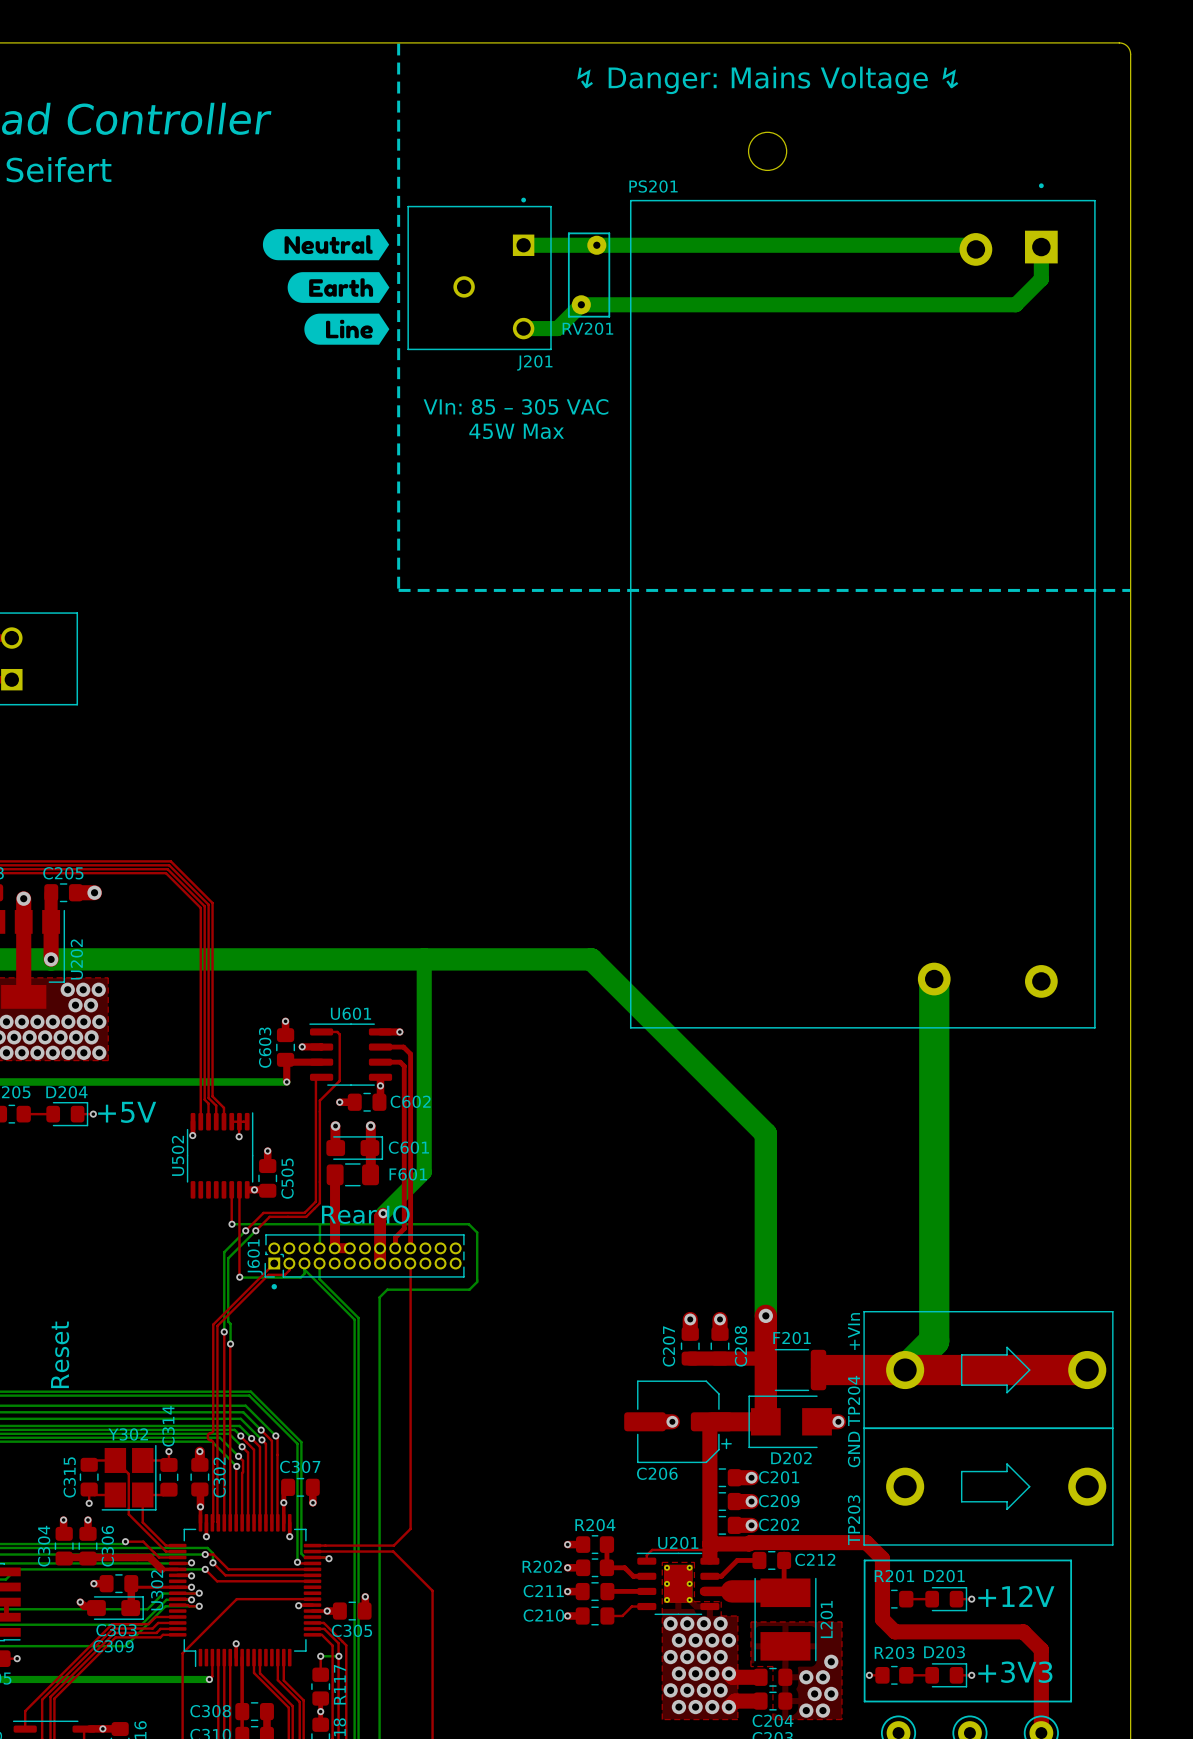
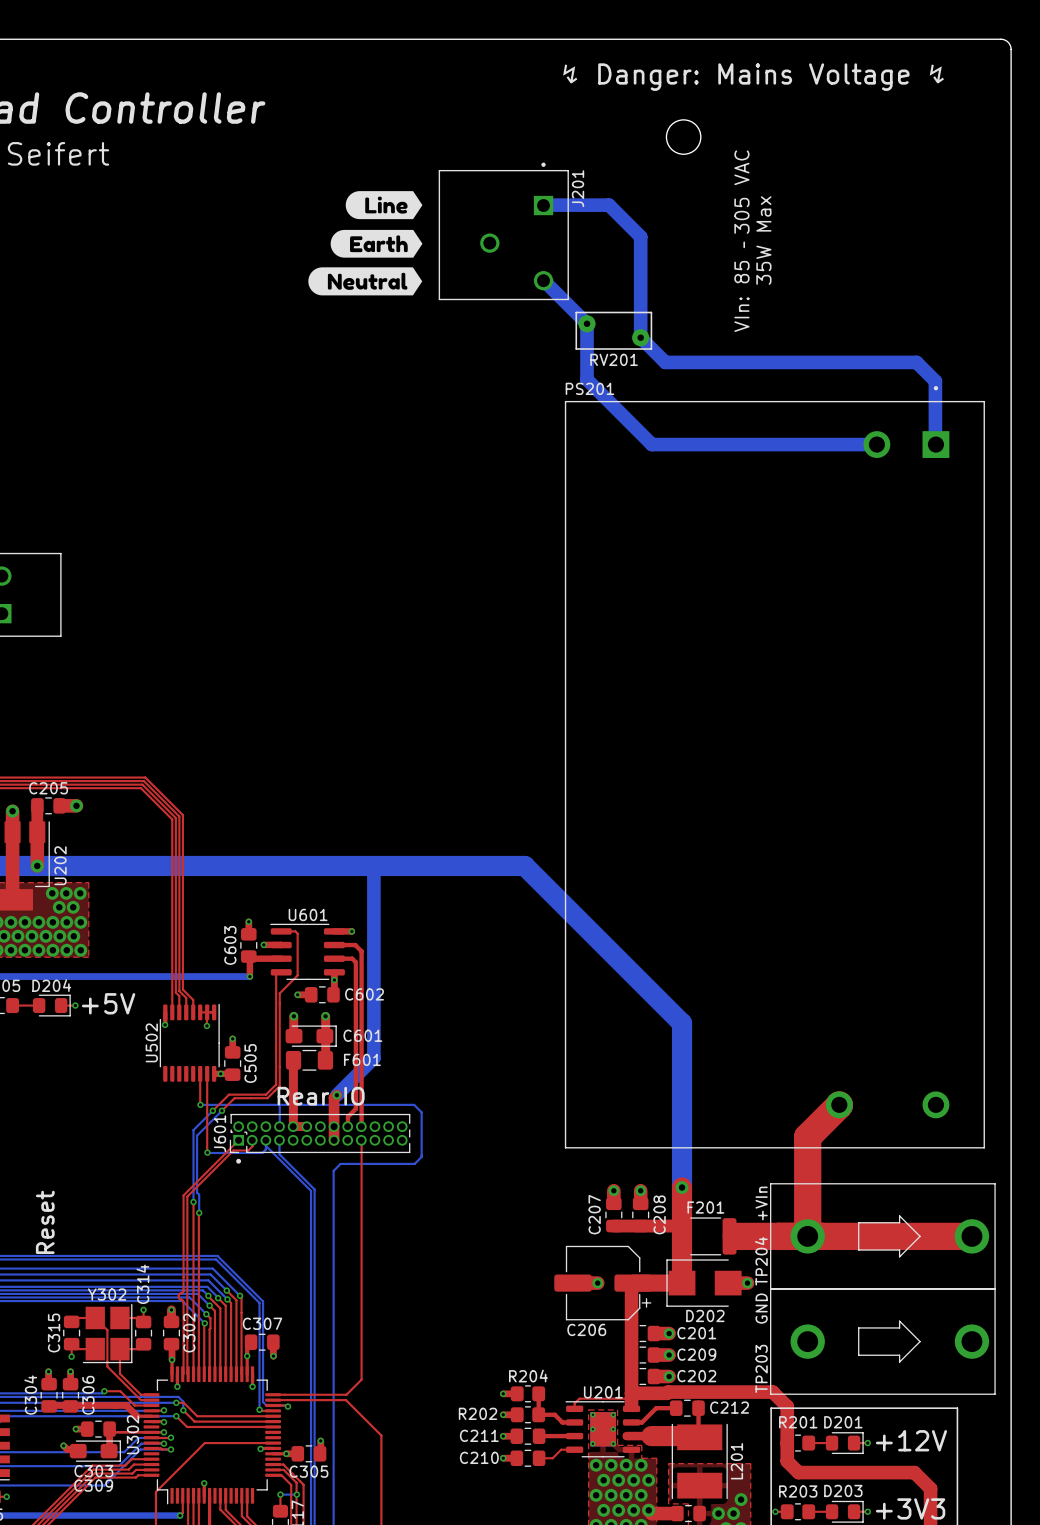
line: (398, 43) (398, 590) (1130, 590) -> none
text position: ↯ Danger: Mains Voltage ↯ (767, 80) -> ↯ Danger: Mains Voltage ↯ (753, 77)
PS201 footprint: [629, 183, 1096, 1029] -> [564, 386, 985, 1149]
bottom track: none -> (543, 205) (609, 205) (640, 236) (640, 337) (665, 362) (916, 362) (935, 381) (935, 444)
drawing position: (326, 244) -> (365, 281)
bottom track: (523, 245) (972, 245) (975, 248) -> none
bottom track: (1041, 248) (1041, 279) (1015, 304) (581, 304) (557, 328) (523, 328) -> none
text: none -> 35W Max (763, 240)
text: none -> VIn: 85 – 305 VAC (741, 241)
J201 position: (479, 273) -> (503, 231)
RV201 rotation: 0° (589, 275) -> 90° clockwise (613, 330)
RV201 position: (589, 275) -> (613, 330)
drawing position: (338, 287) -> (376, 243)
bottom track: none -> (544, 280) (587, 323) (587, 379) (651, 444) (876, 444)
drawing position: (346, 329) -> (384, 205)
J201 name rotation: 0° (534, 362) -> 90° counterclockwise (578, 188)
J201 name position: J201 (534, 362) -> J201 (578, 188)
text: VIn: 85 – 305 VAC (515, 406) -> none
text: 45W Max (516, 431) -> none
bottom track: (934, 979) (934, 1340) (905, 1370) -> none
top track: none -> (839, 1104) (807, 1137) (807, 1236)

